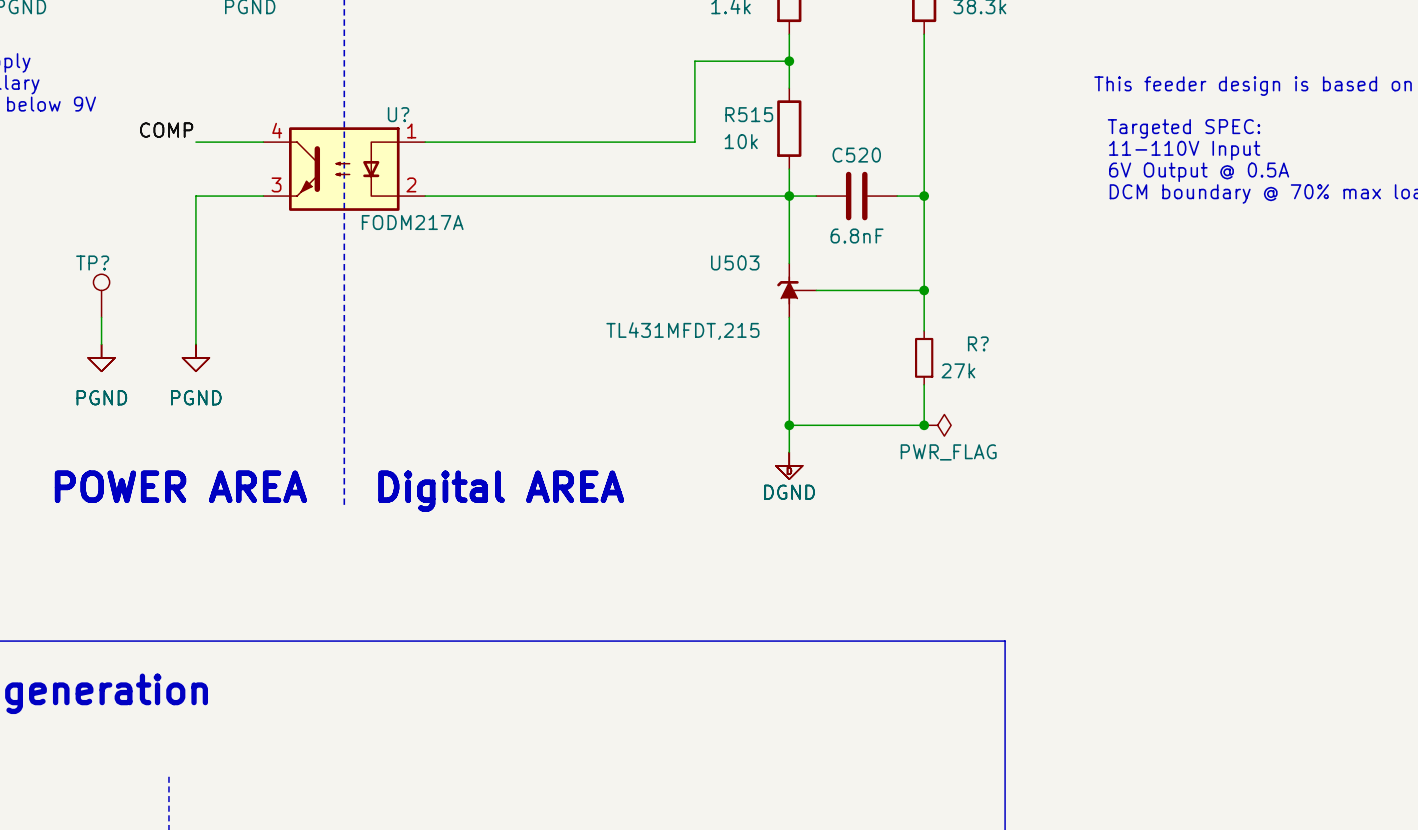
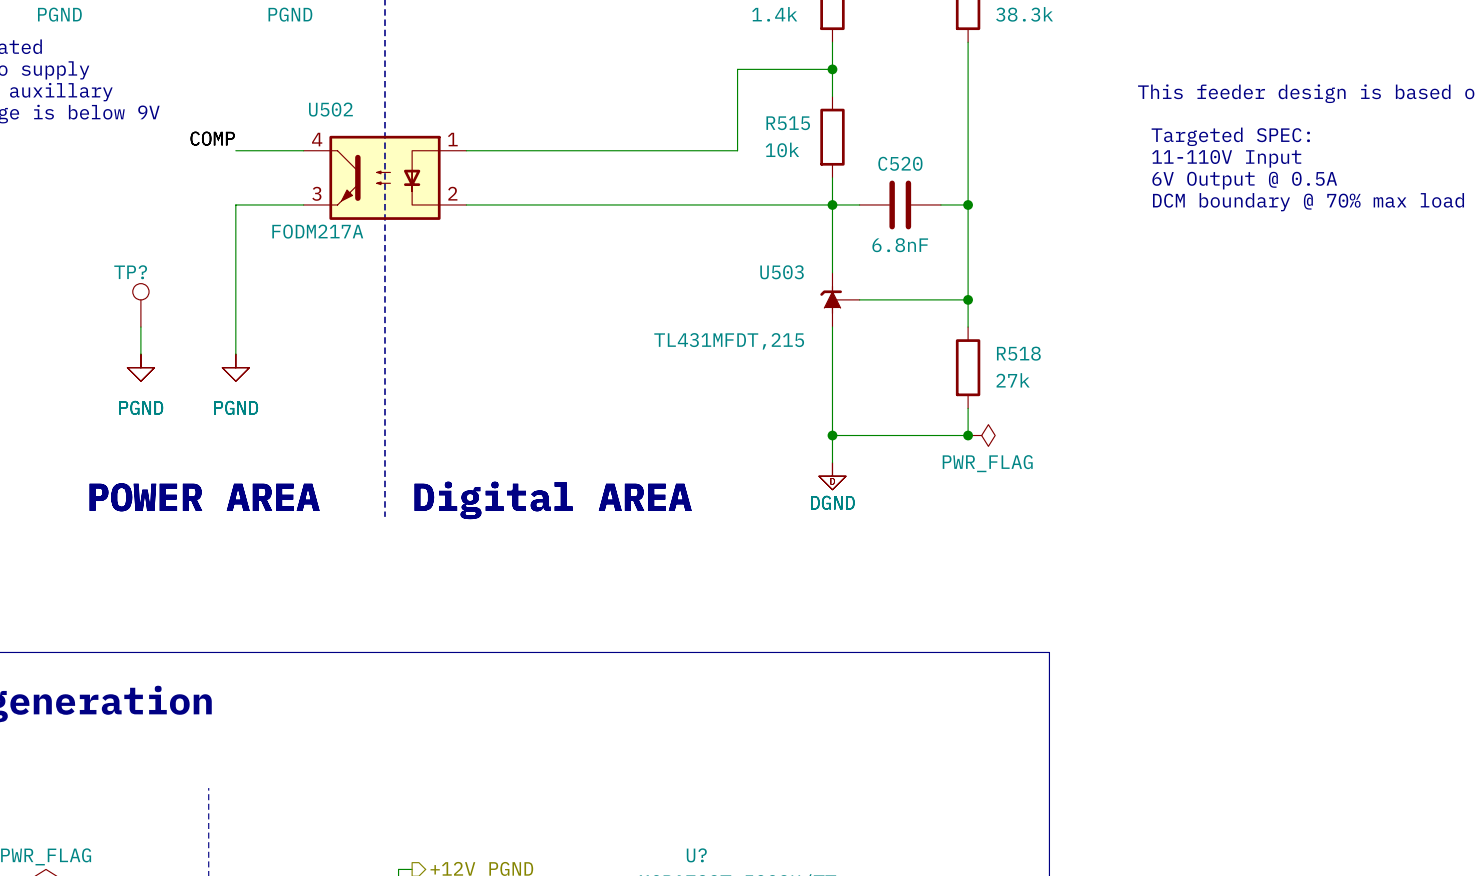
U?: FODM217A (344, 169) -> none
U502: none -> (385, 177)
R?: 27k (924, 357) -> none
R518: none -> 27k (968, 367)

